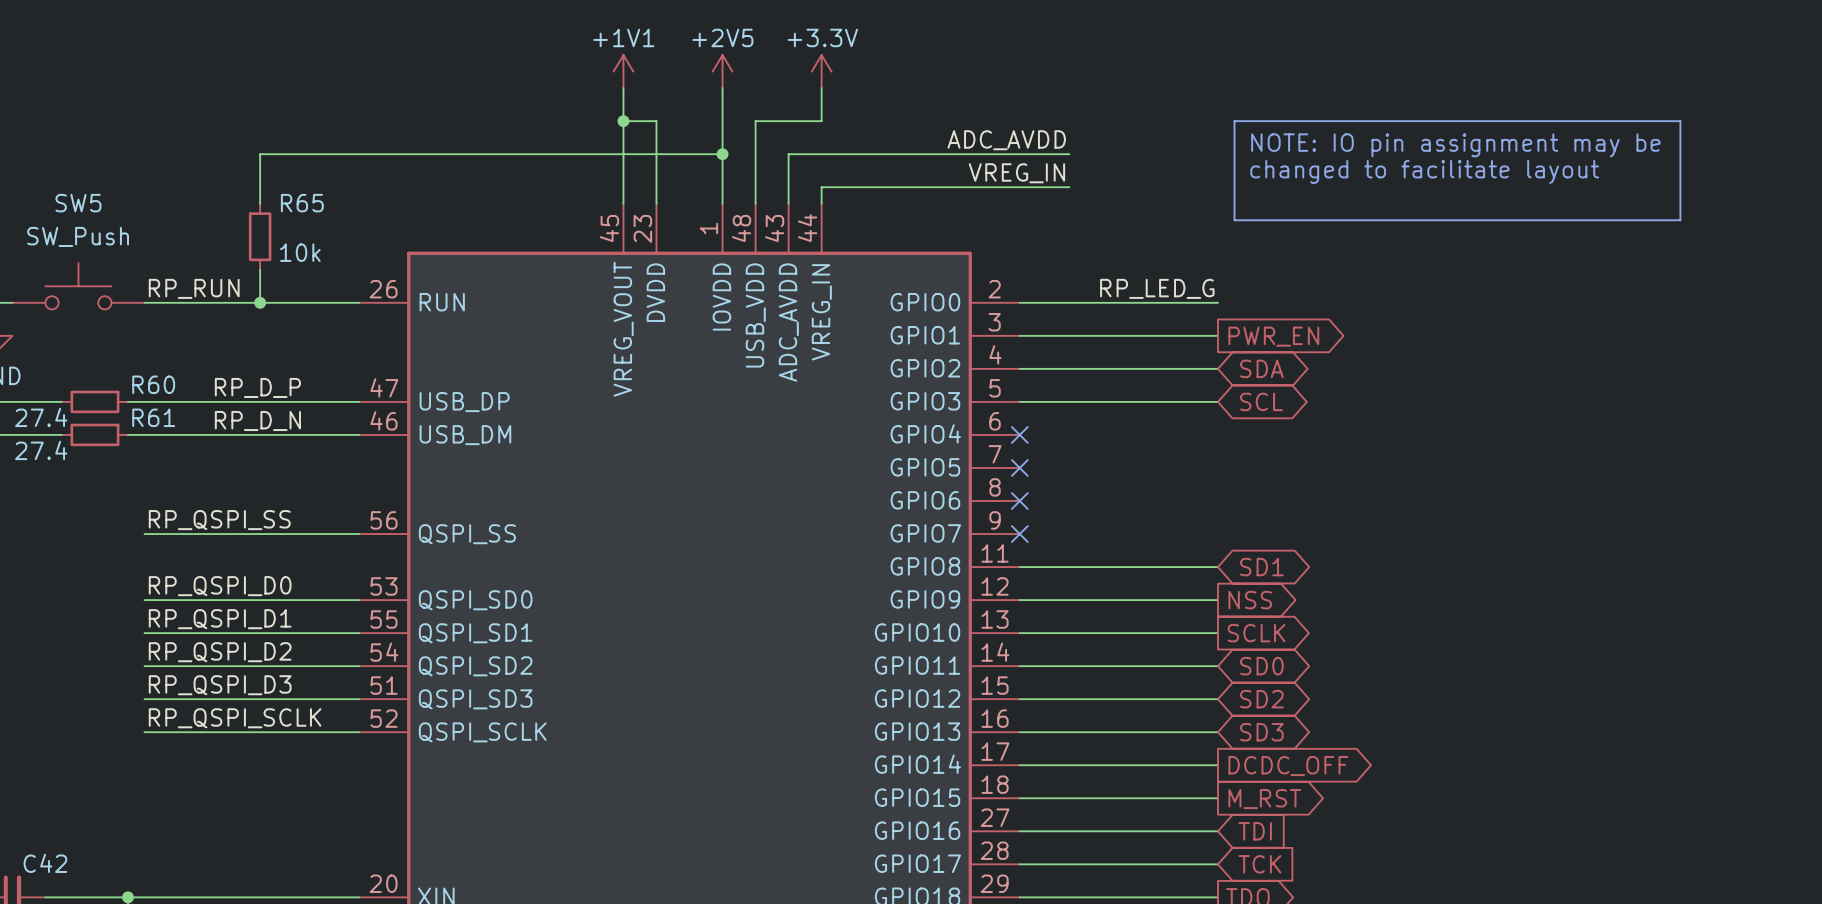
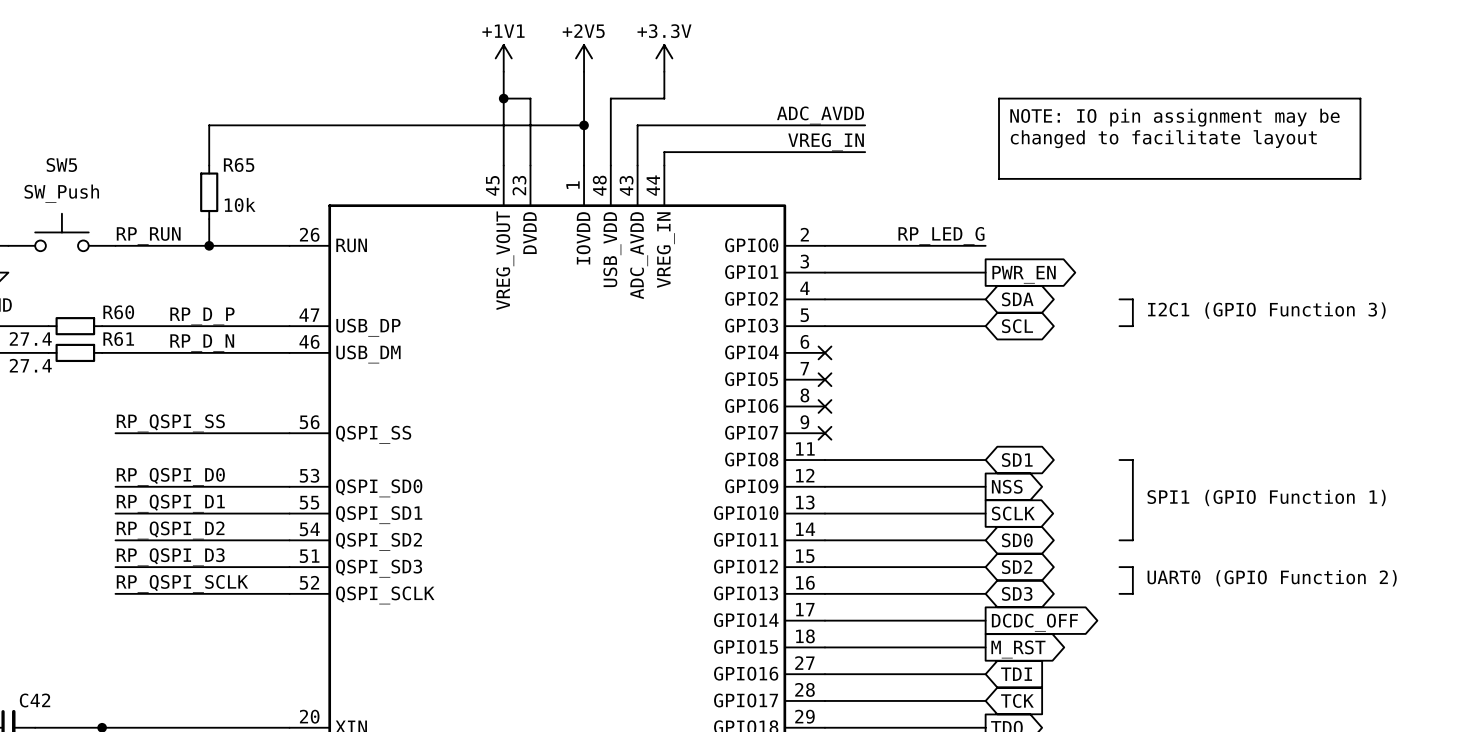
line: none -> (1119, 299) (1132, 299) (1132, 326) (1119, 326)
text: none -> I2C1 (GPIO Function 3) (1266, 310)
line: none -> (1119, 460) (1132, 460) (1132, 540) (1119, 540)
text: none -> SPI1 (GPIO Function 1) (1266, 497)
line: none -> (1119, 567) (1132, 567) (1132, 593) (1119, 593)
text: none -> UART0 (GPIO Function 2) (1272, 578)

